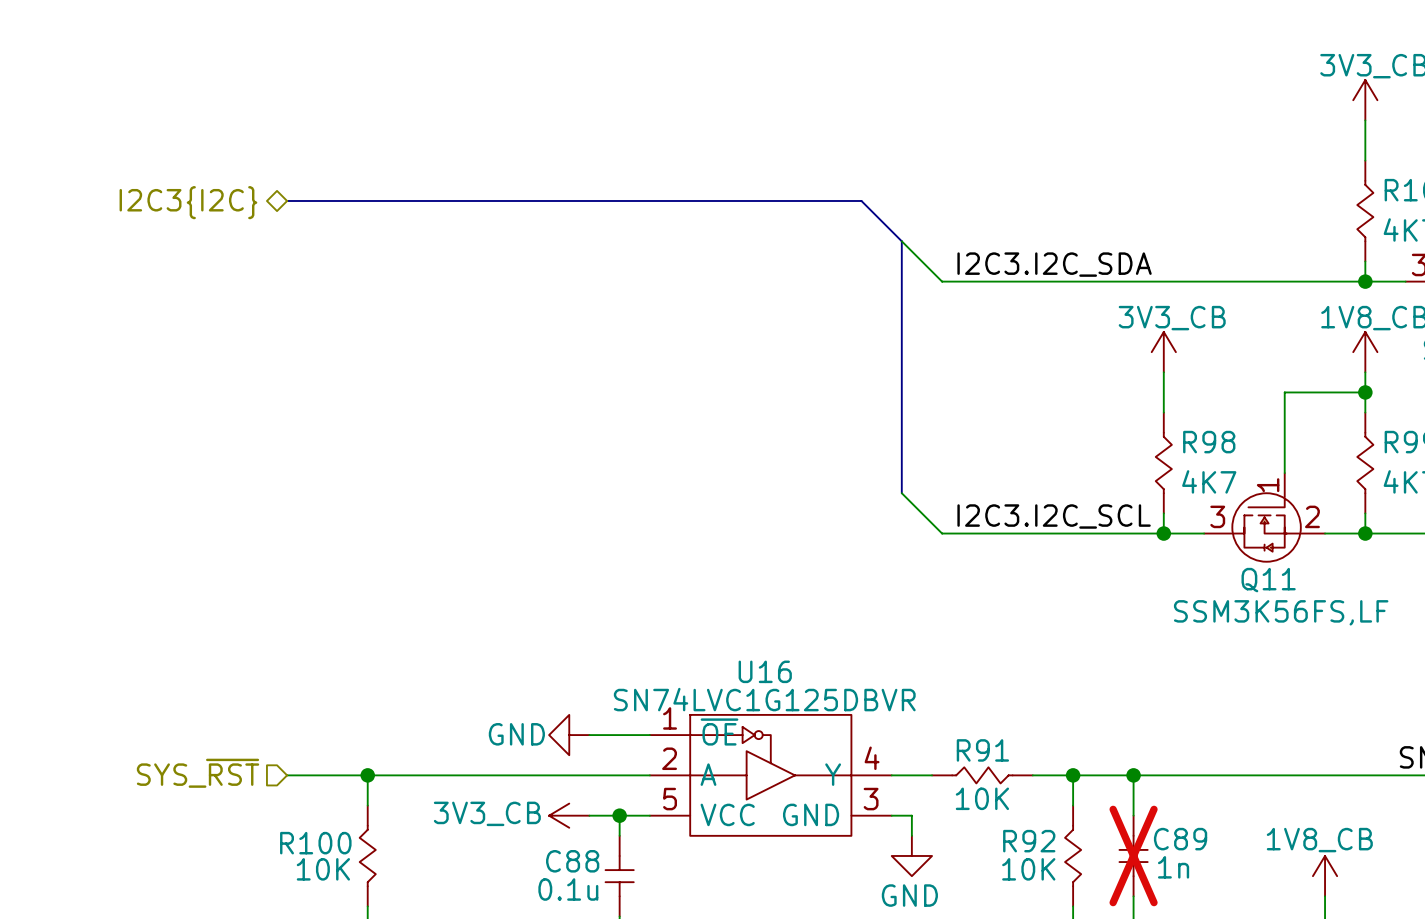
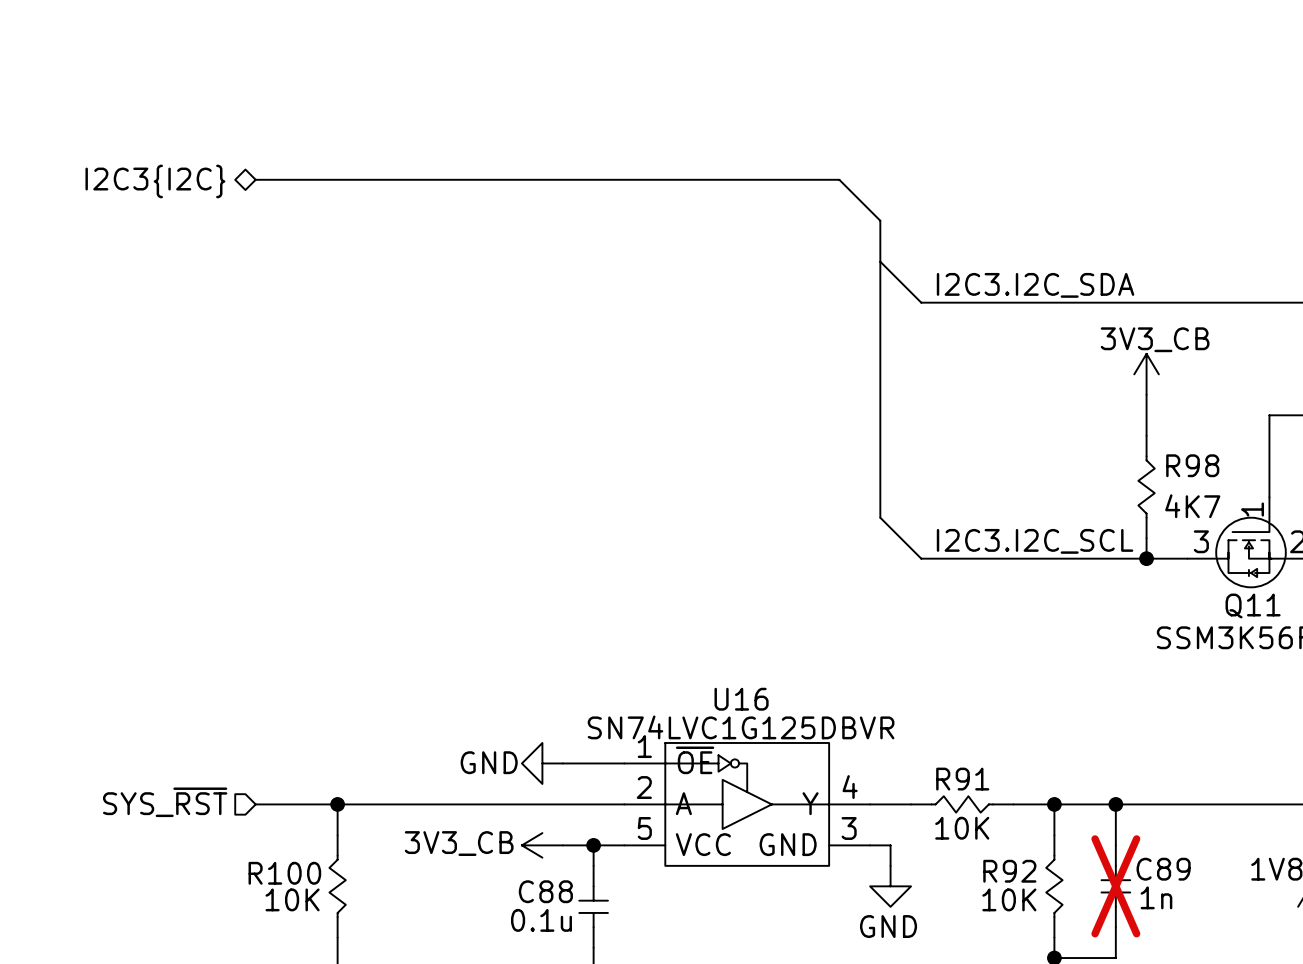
bus: (287, 200) (861, 200) (901, 241) -> (255, 179) (839, 179) (880, 220) (880, 261)
hierarchical label position: I2C3{I2C} (188, 202) -> I2C3{I2C} (155, 181)

